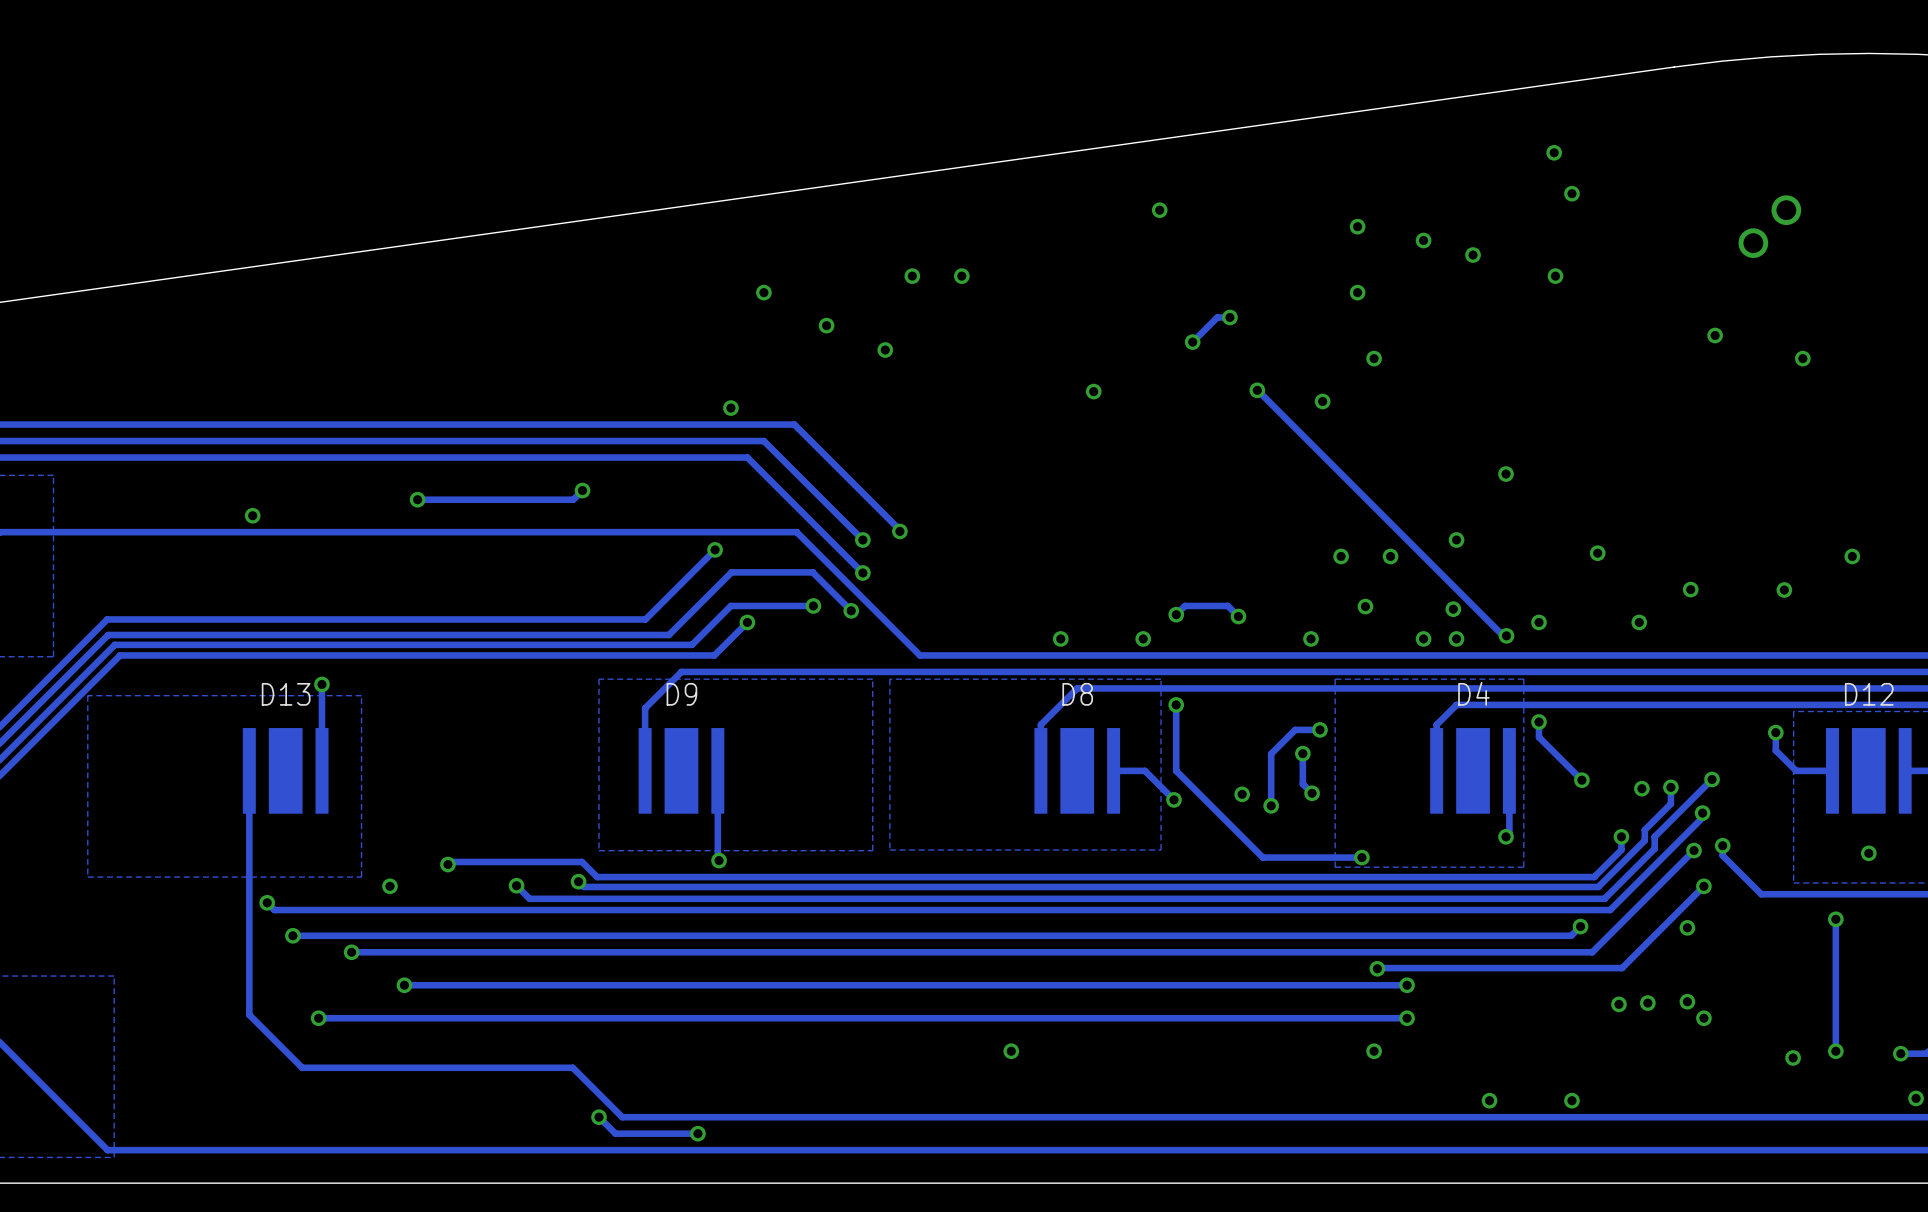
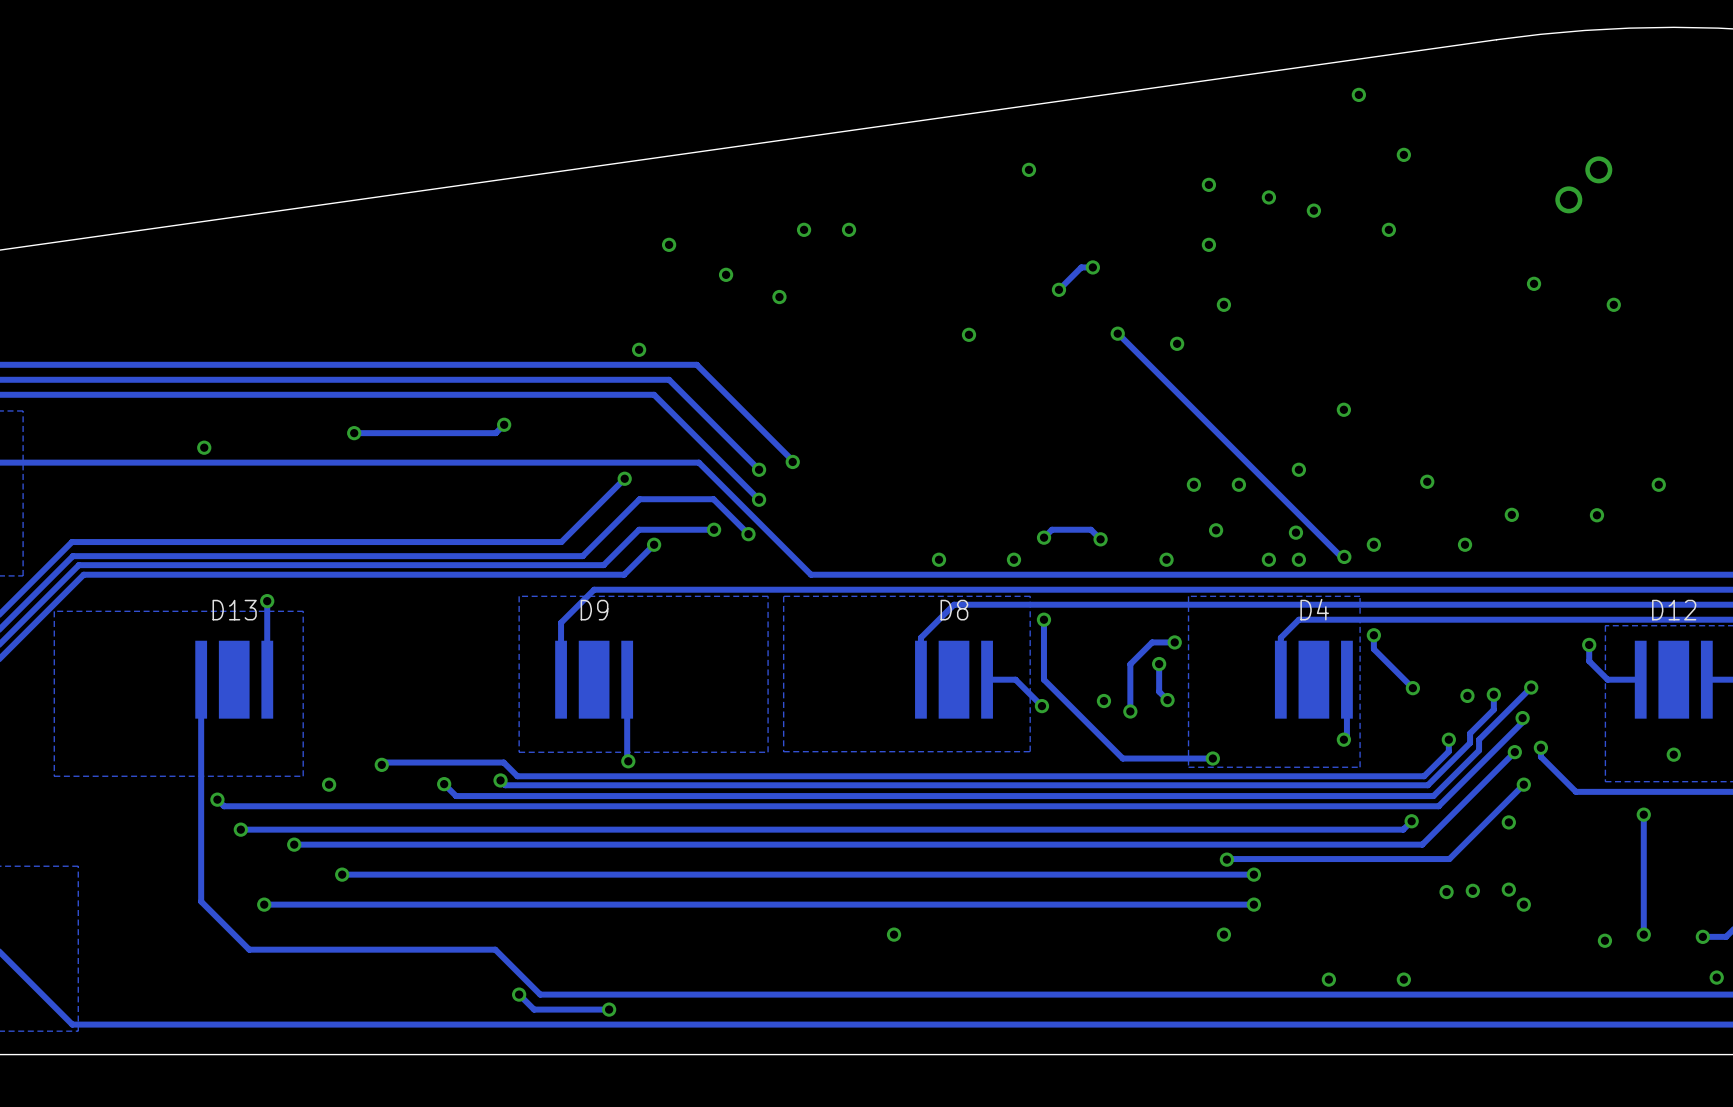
via position: (1554, 152) -> (1358, 94)

